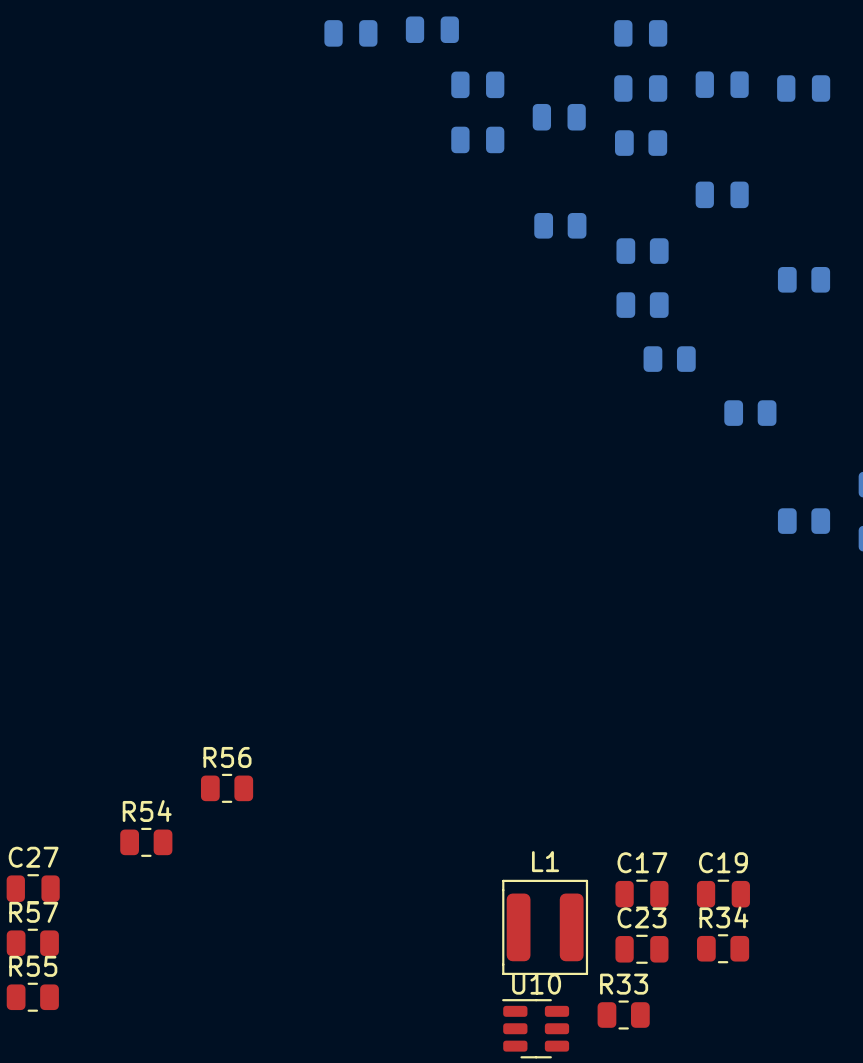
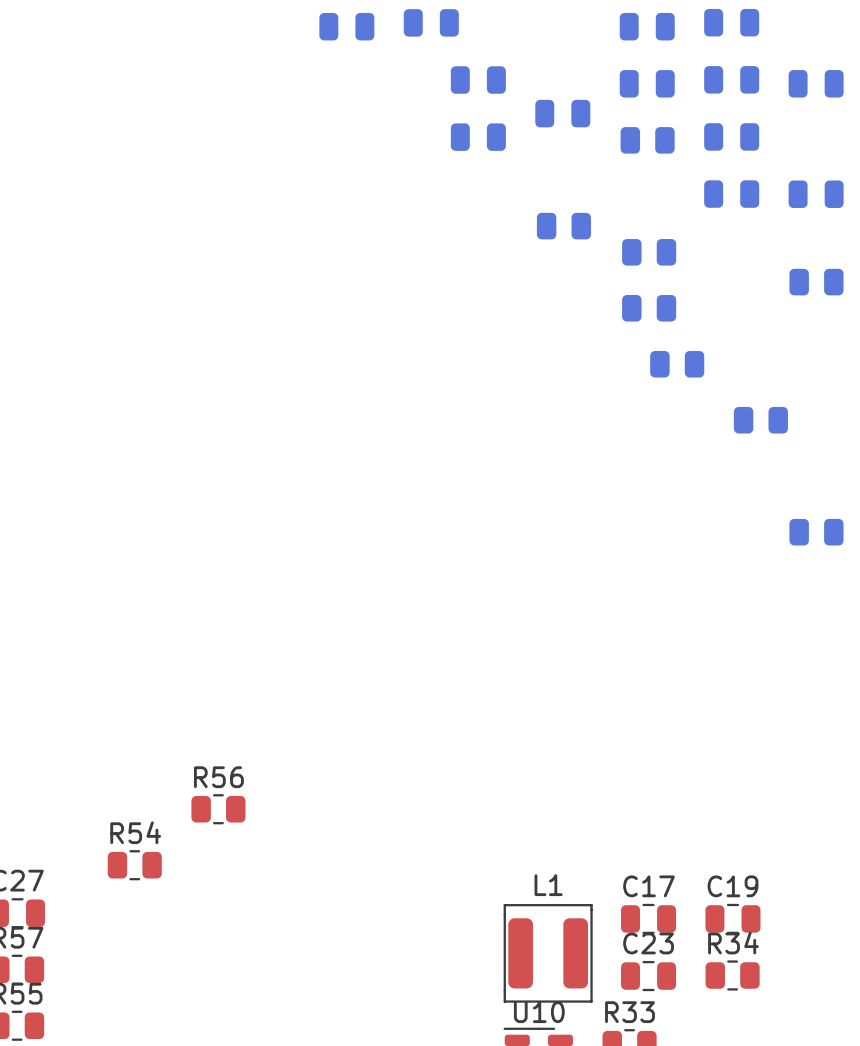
part: none -> (731, 22)
part: none -> (731, 136)
part: none -> (816, 194)

